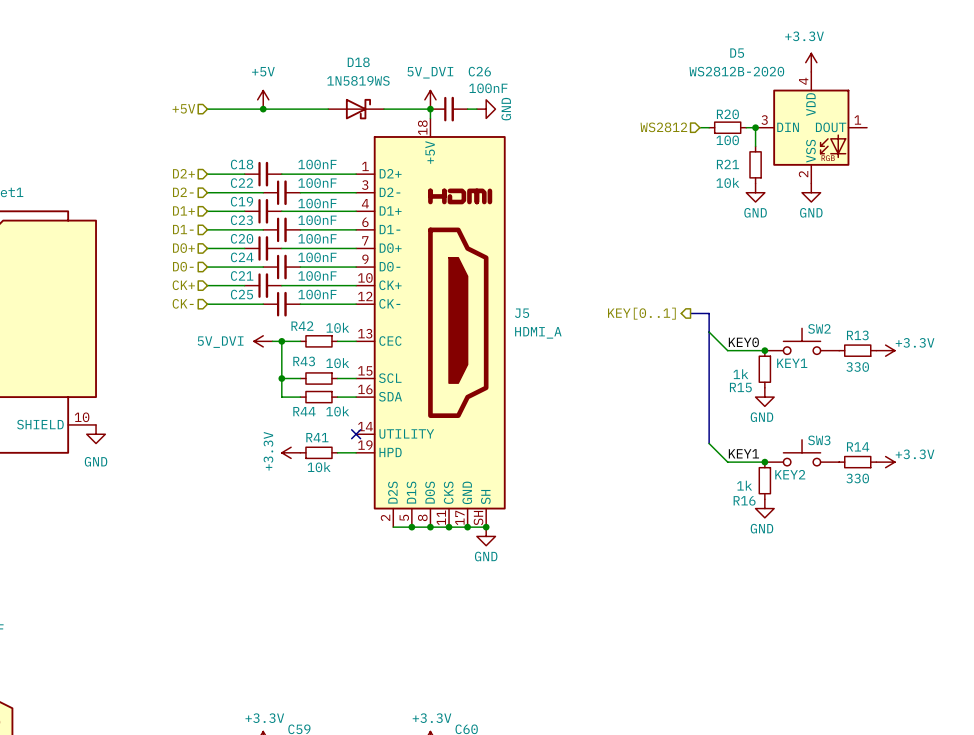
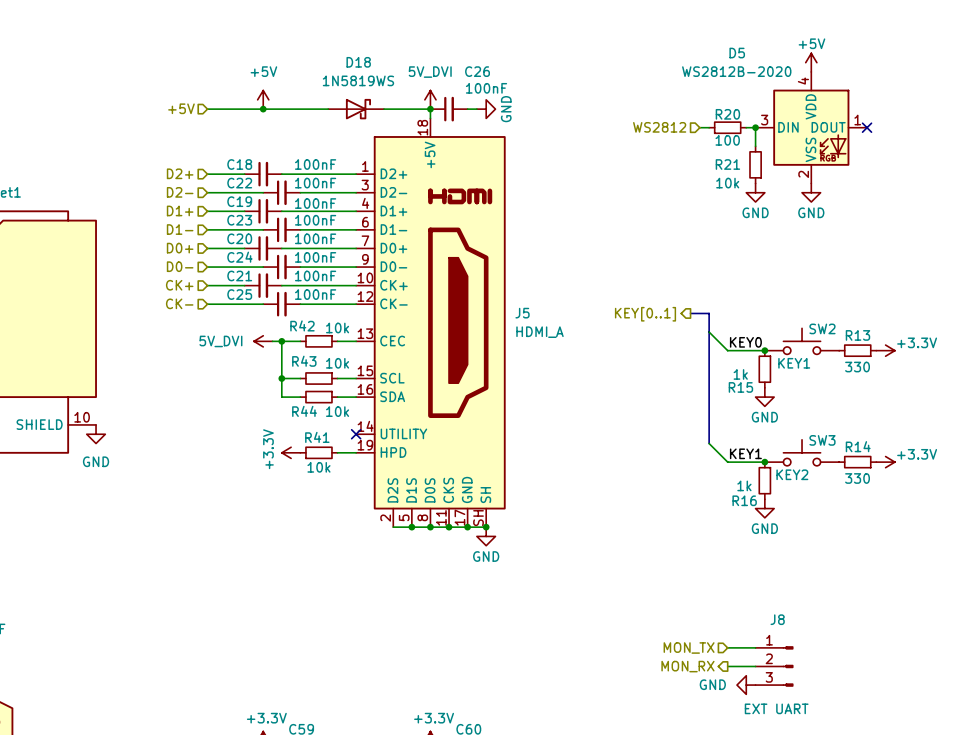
power symbol: +3.3V (811, 62) -> +5V (811, 62)
no-connect mark: none -> (867, 127)
wire: none -> (727, 647) (755, 647)
hierarchical label: none -> MON_TX (689, 648)
wire: none -> (727, 666) (755, 666)
J8: none -> EXT UART (774, 666)
hierarchical label: none -> MON_RX (687, 666)
power symbol: none -> GND (746, 685)

